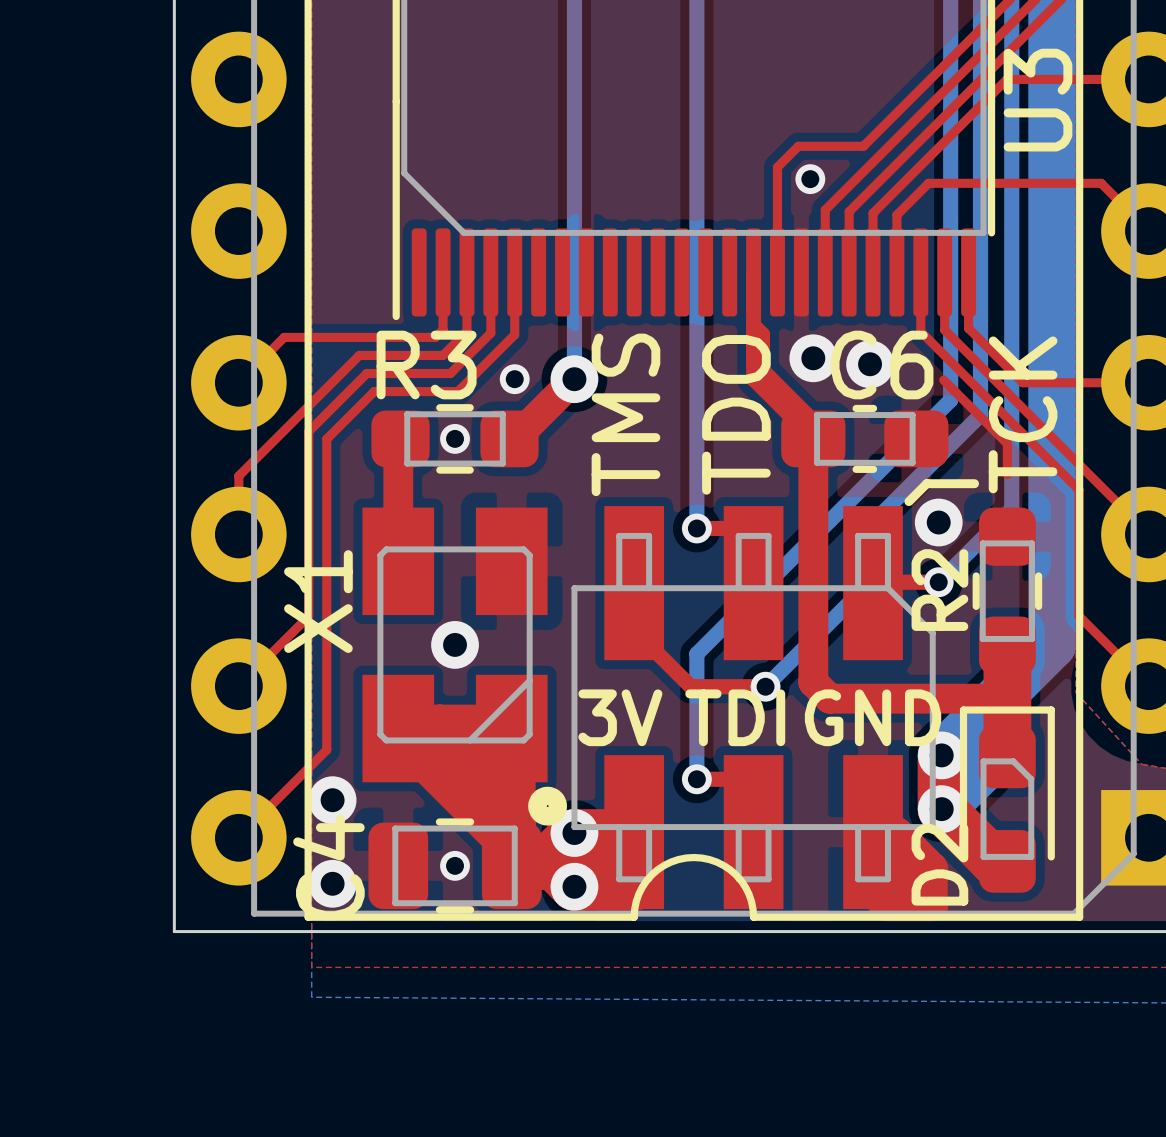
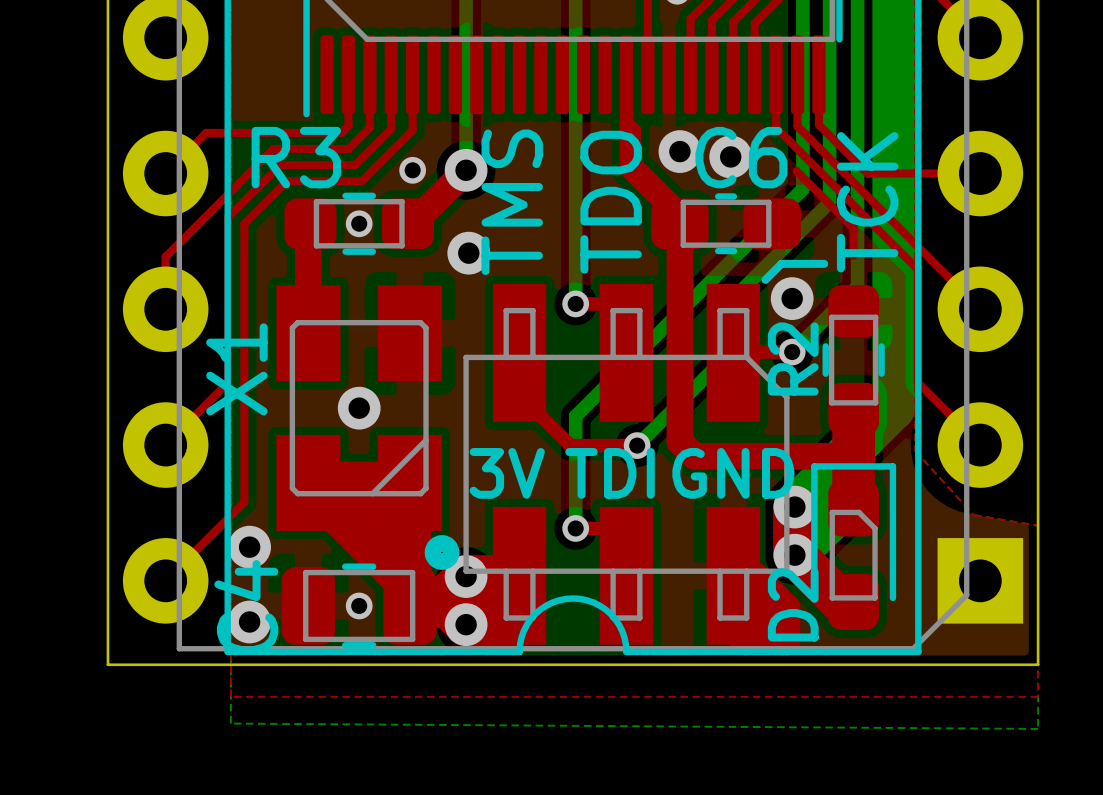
R3 name position: R3 (426, 365) -> R3 (296, 157)
via: none -> (468, 253)

